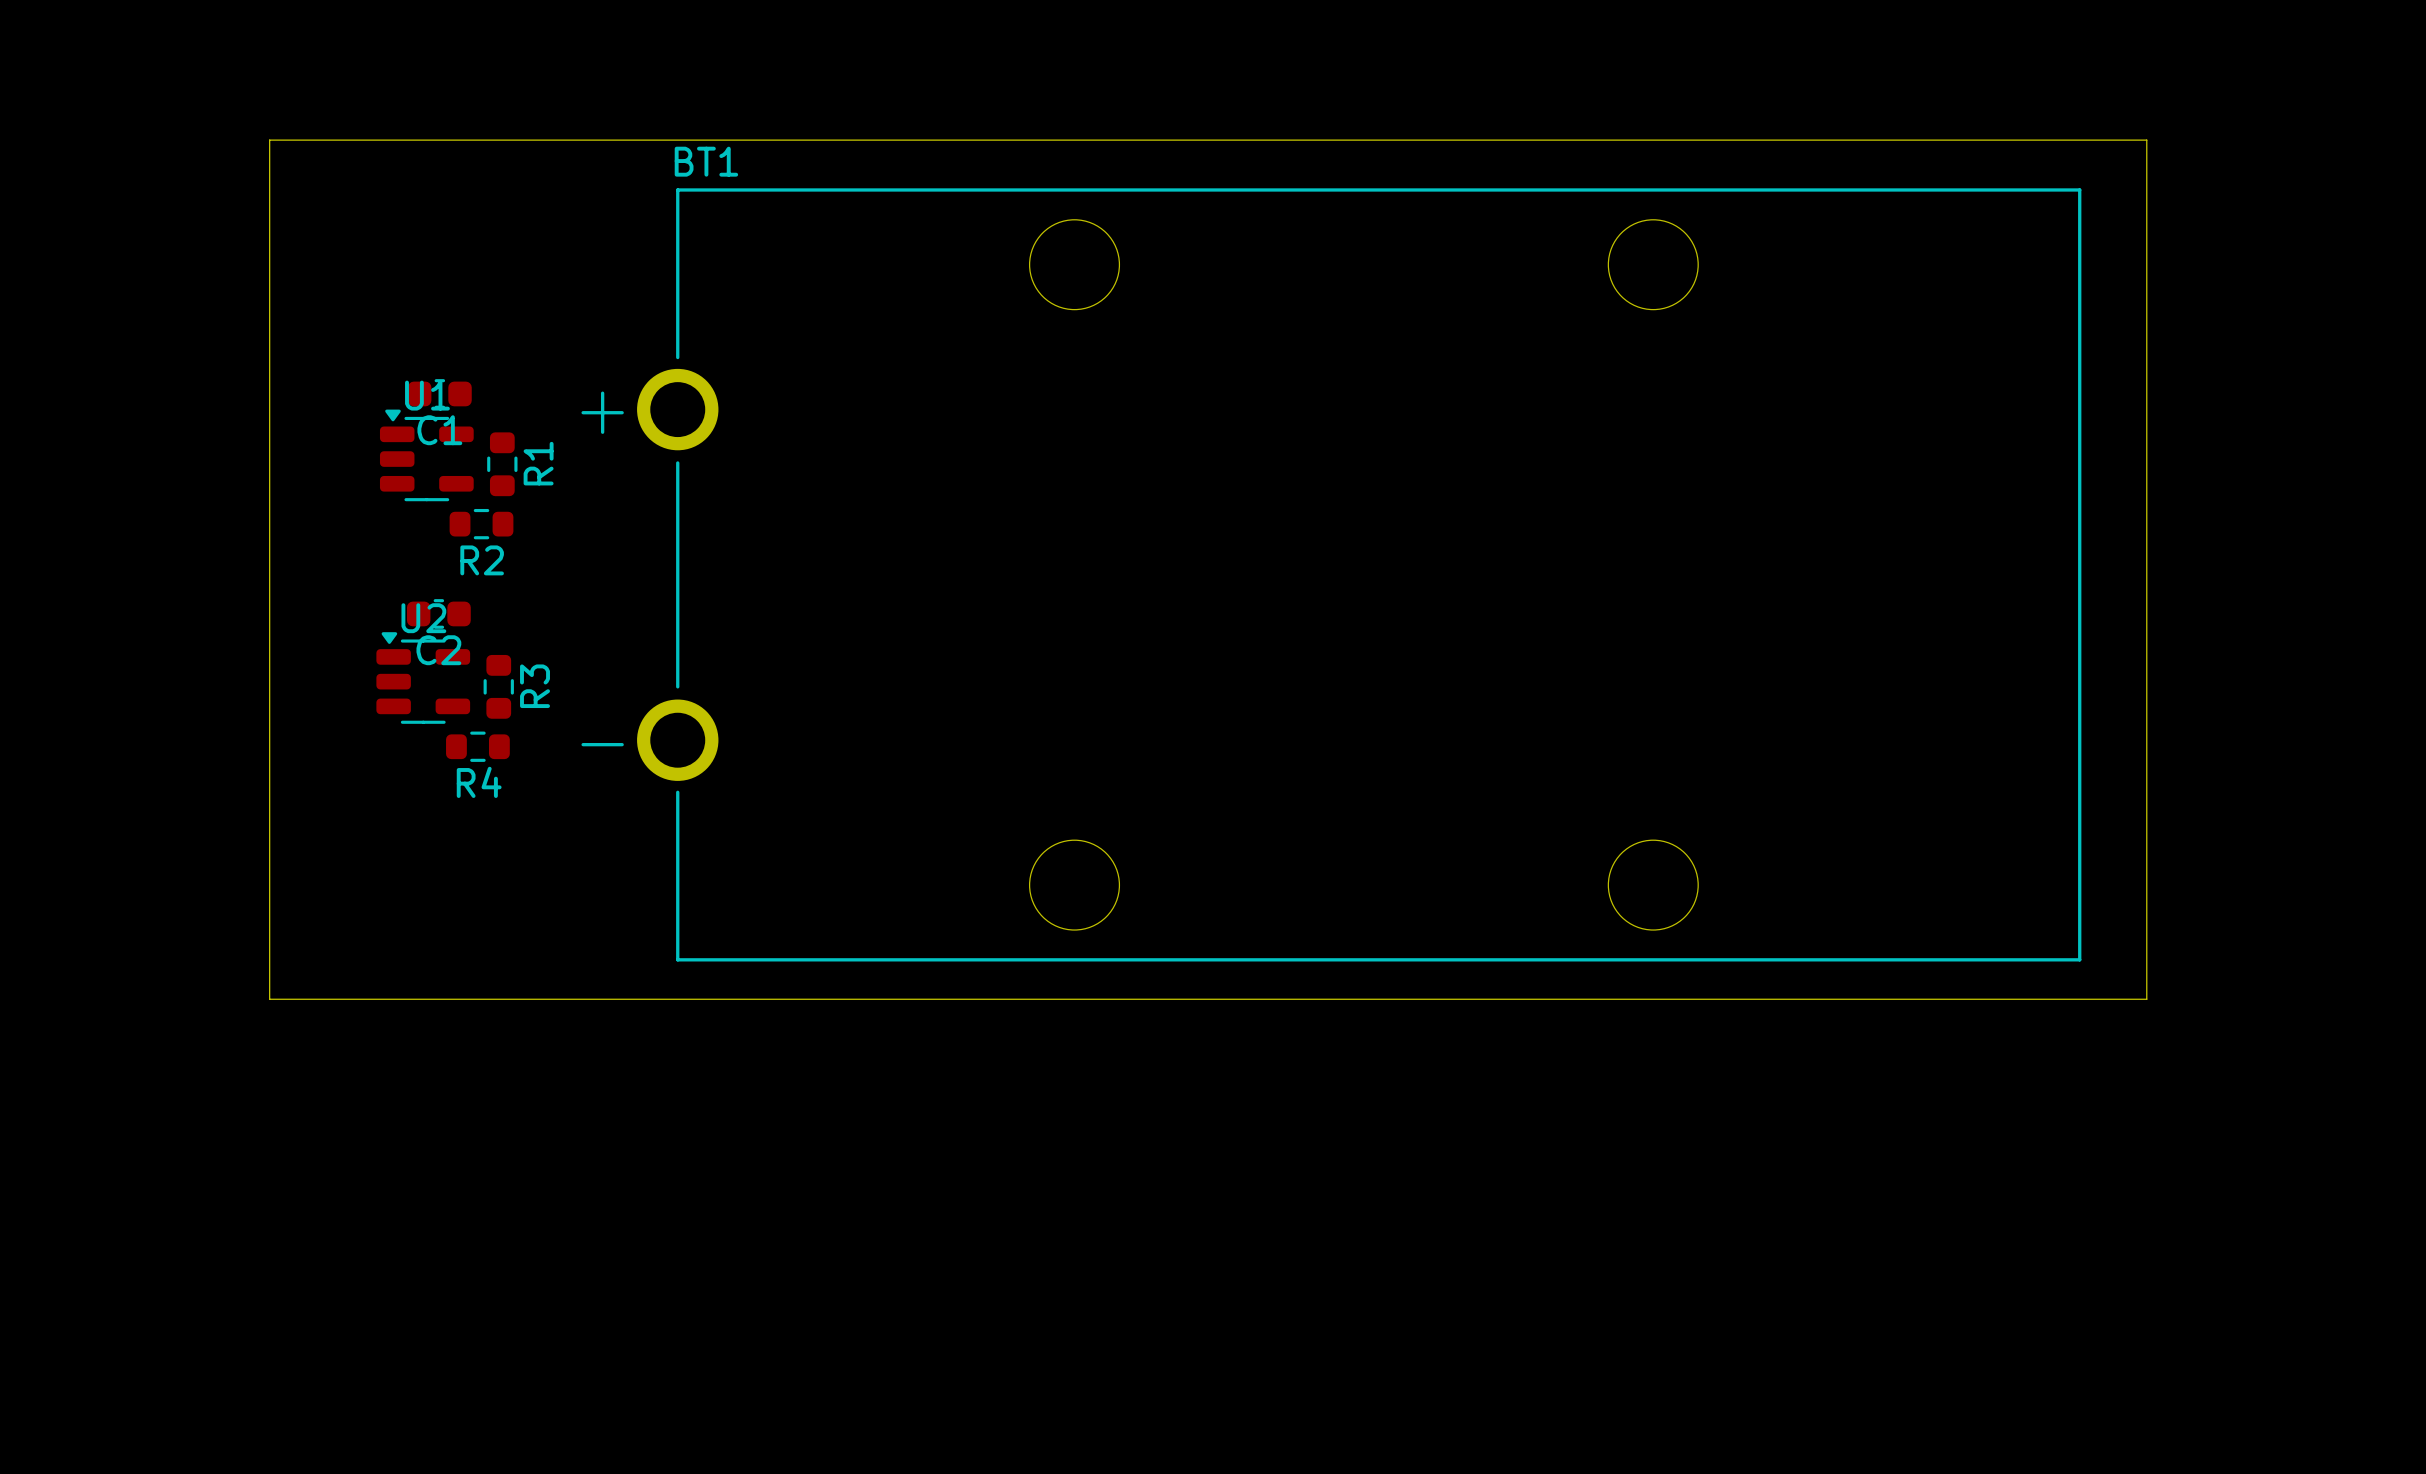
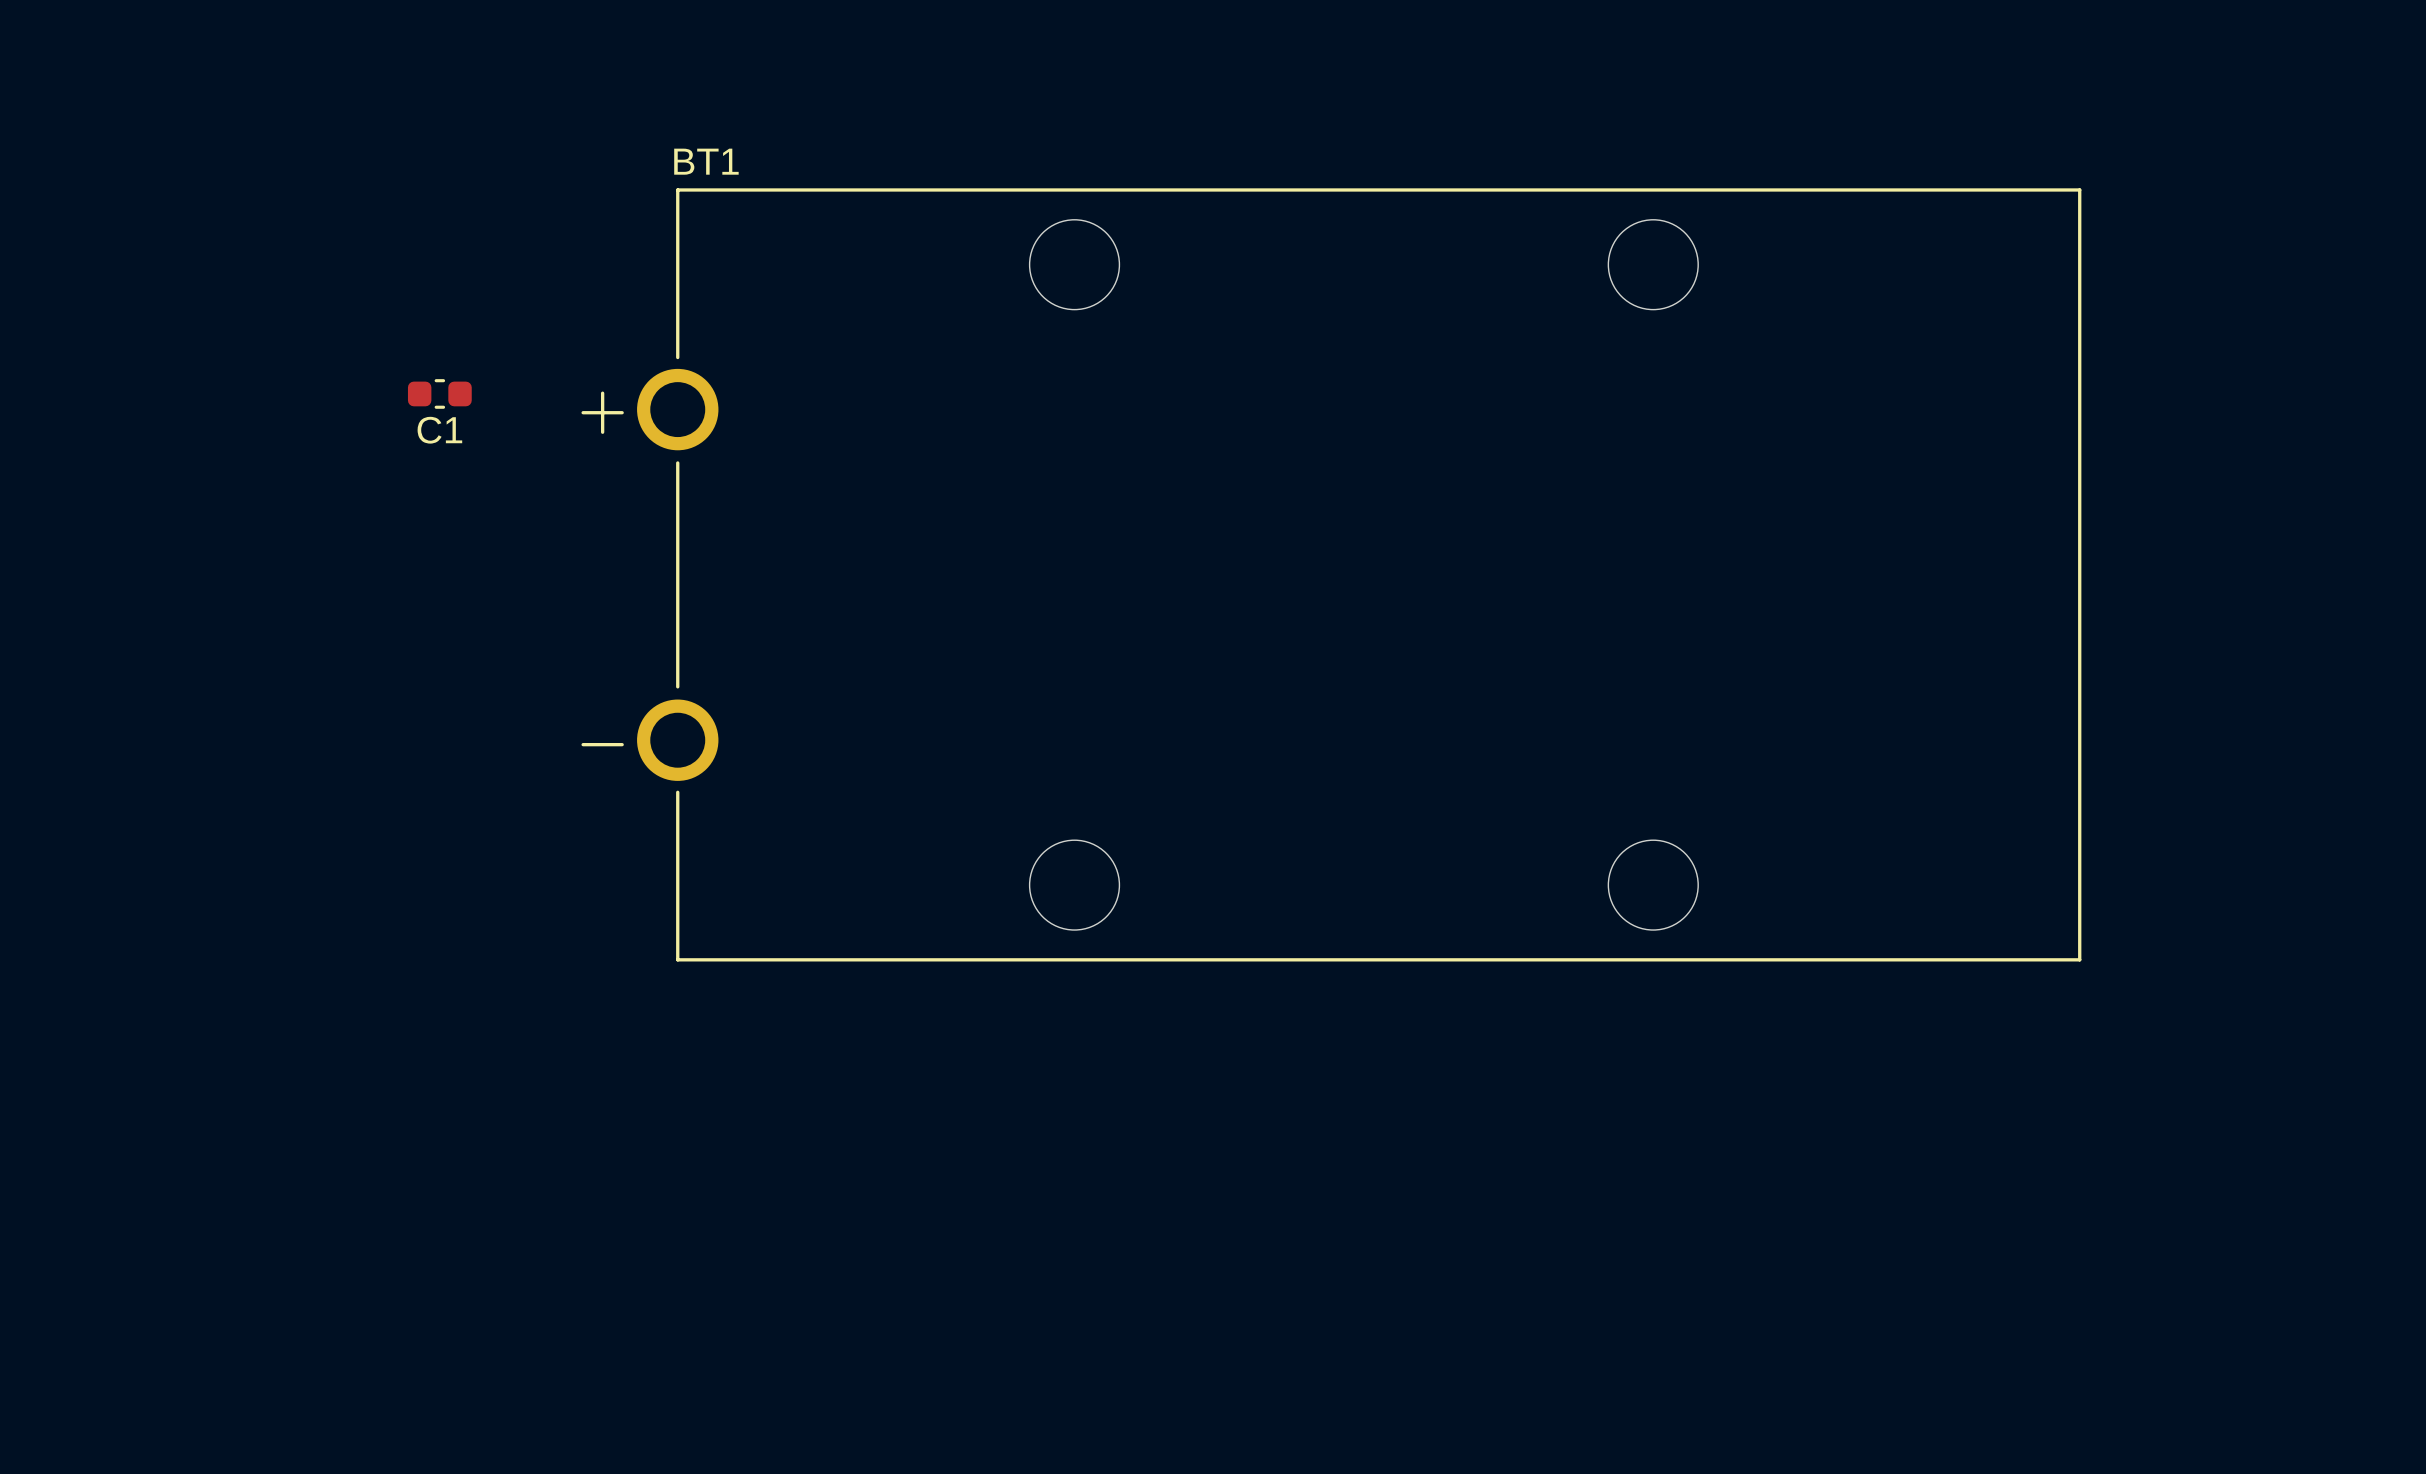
board edge: (269, 140) (2146, 140) (2146, 999) (269, 999) (269, 140) -> none
U1: (426, 455) -> none
R1: (502, 464) -> none
R2: (481, 524) -> none
C2: (438, 613) -> none
U2: (423, 678) -> none
R3: (498, 686) -> none
R4: (477, 746) -> none

